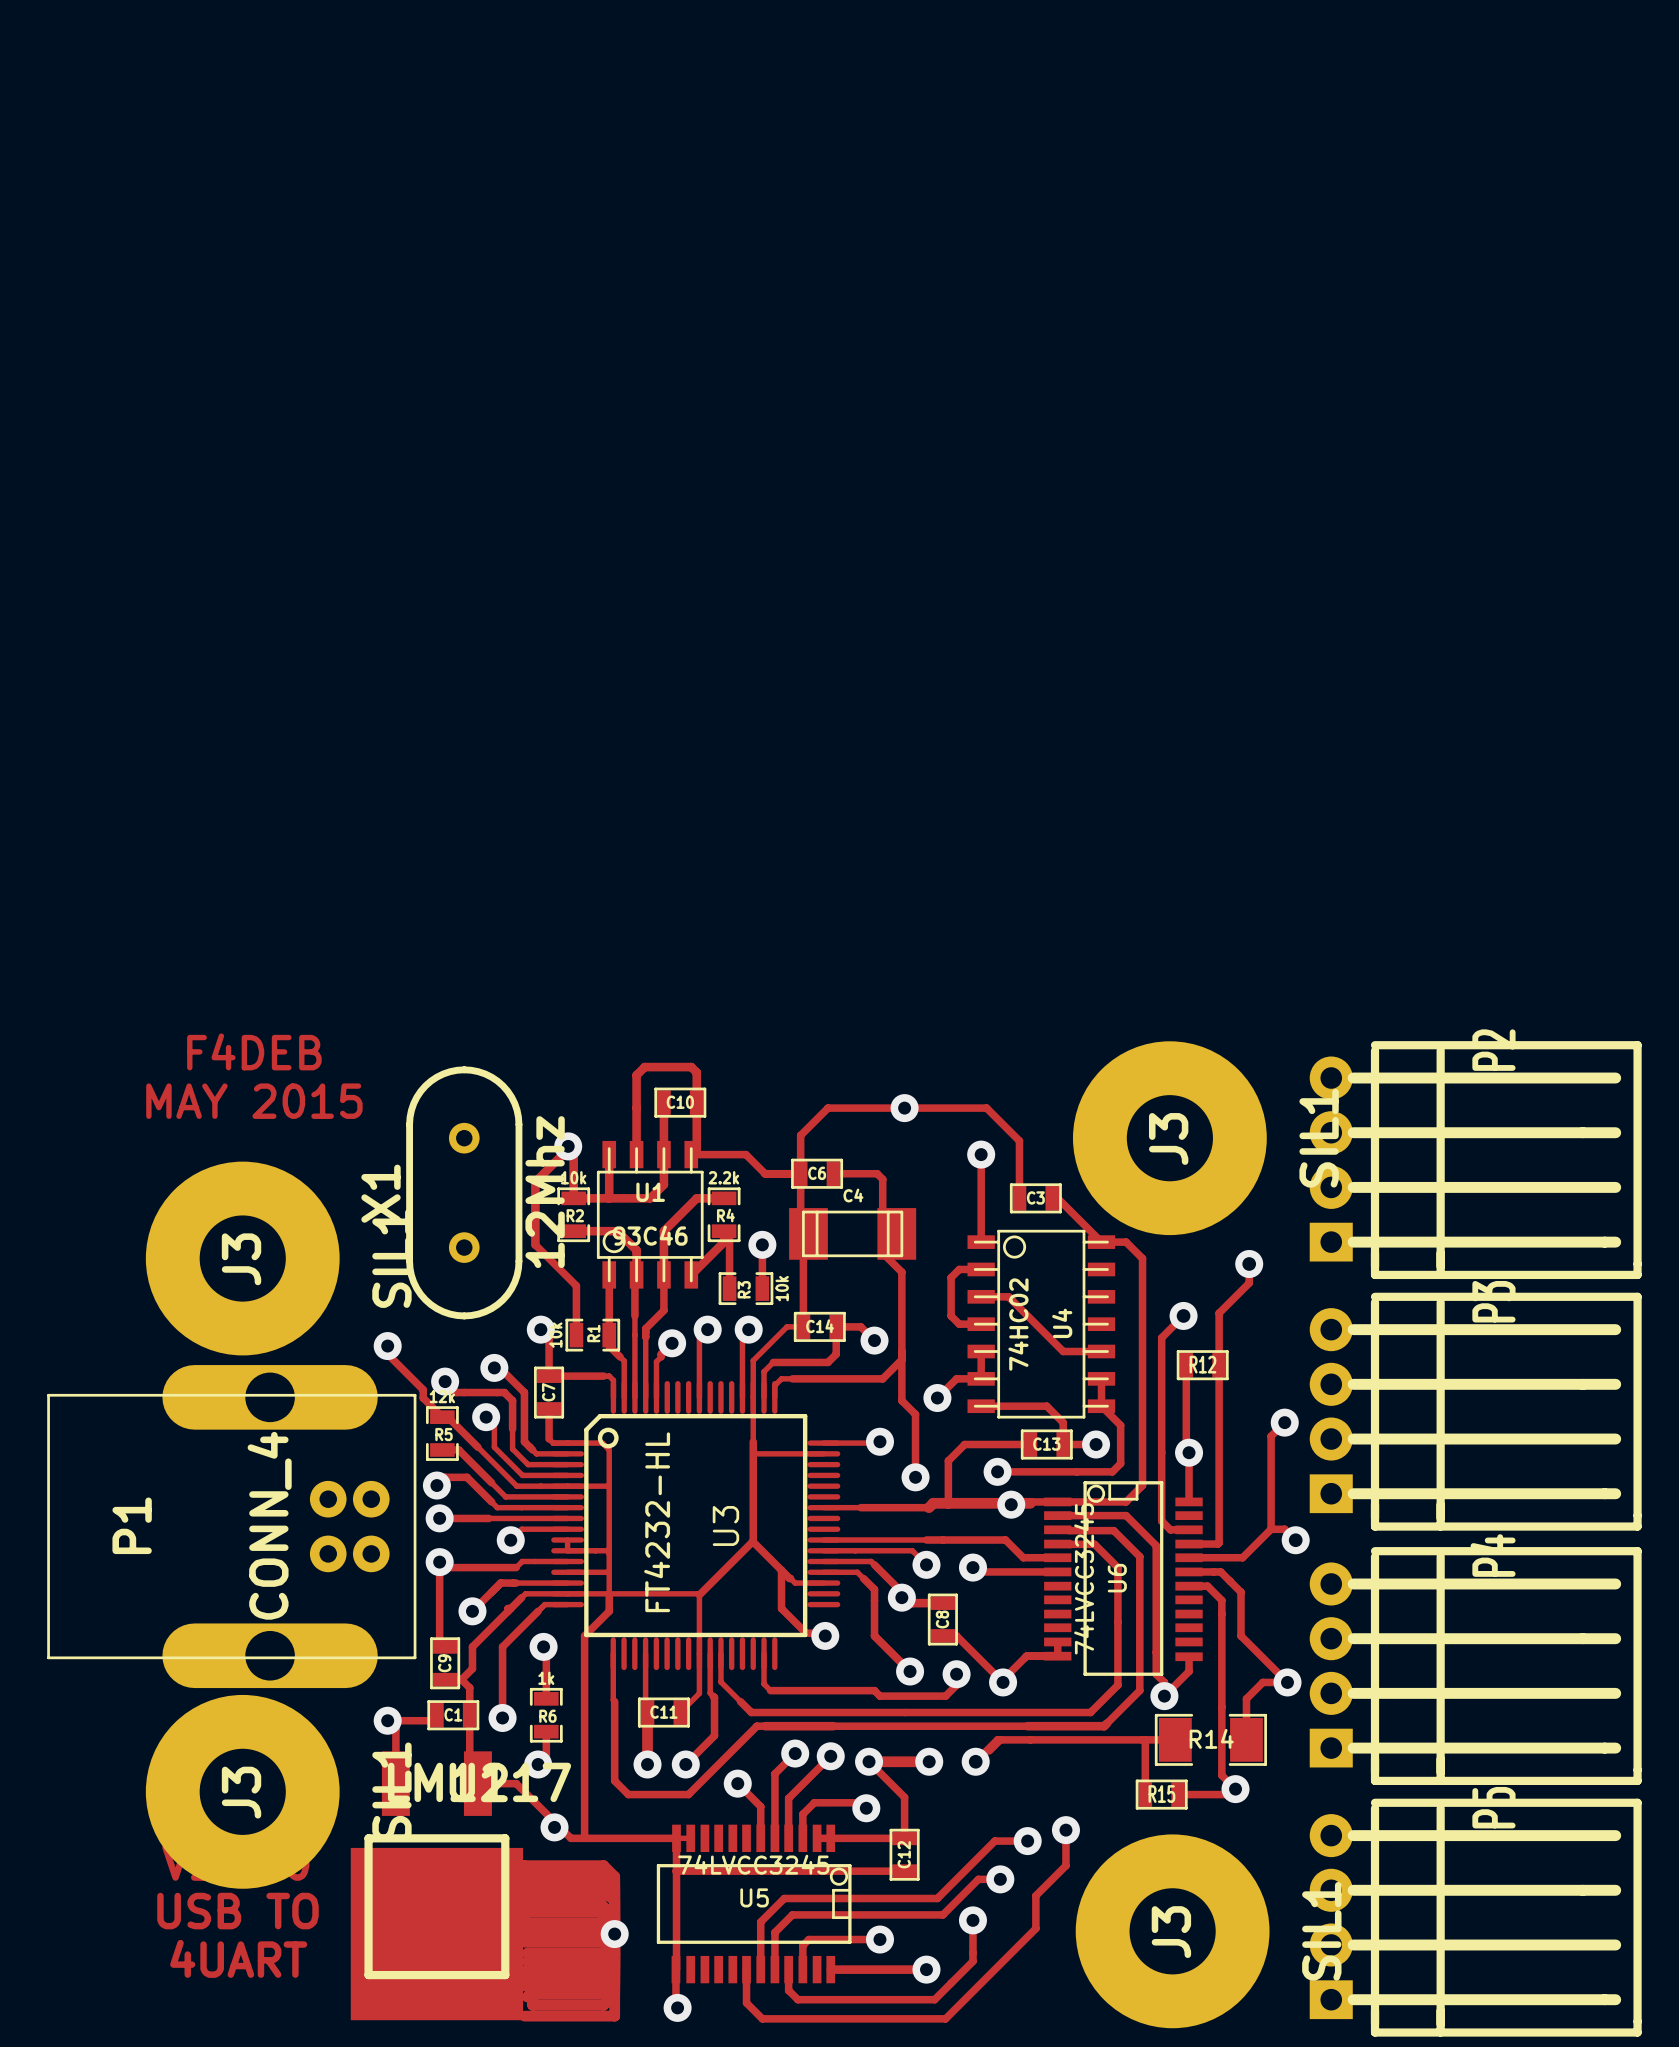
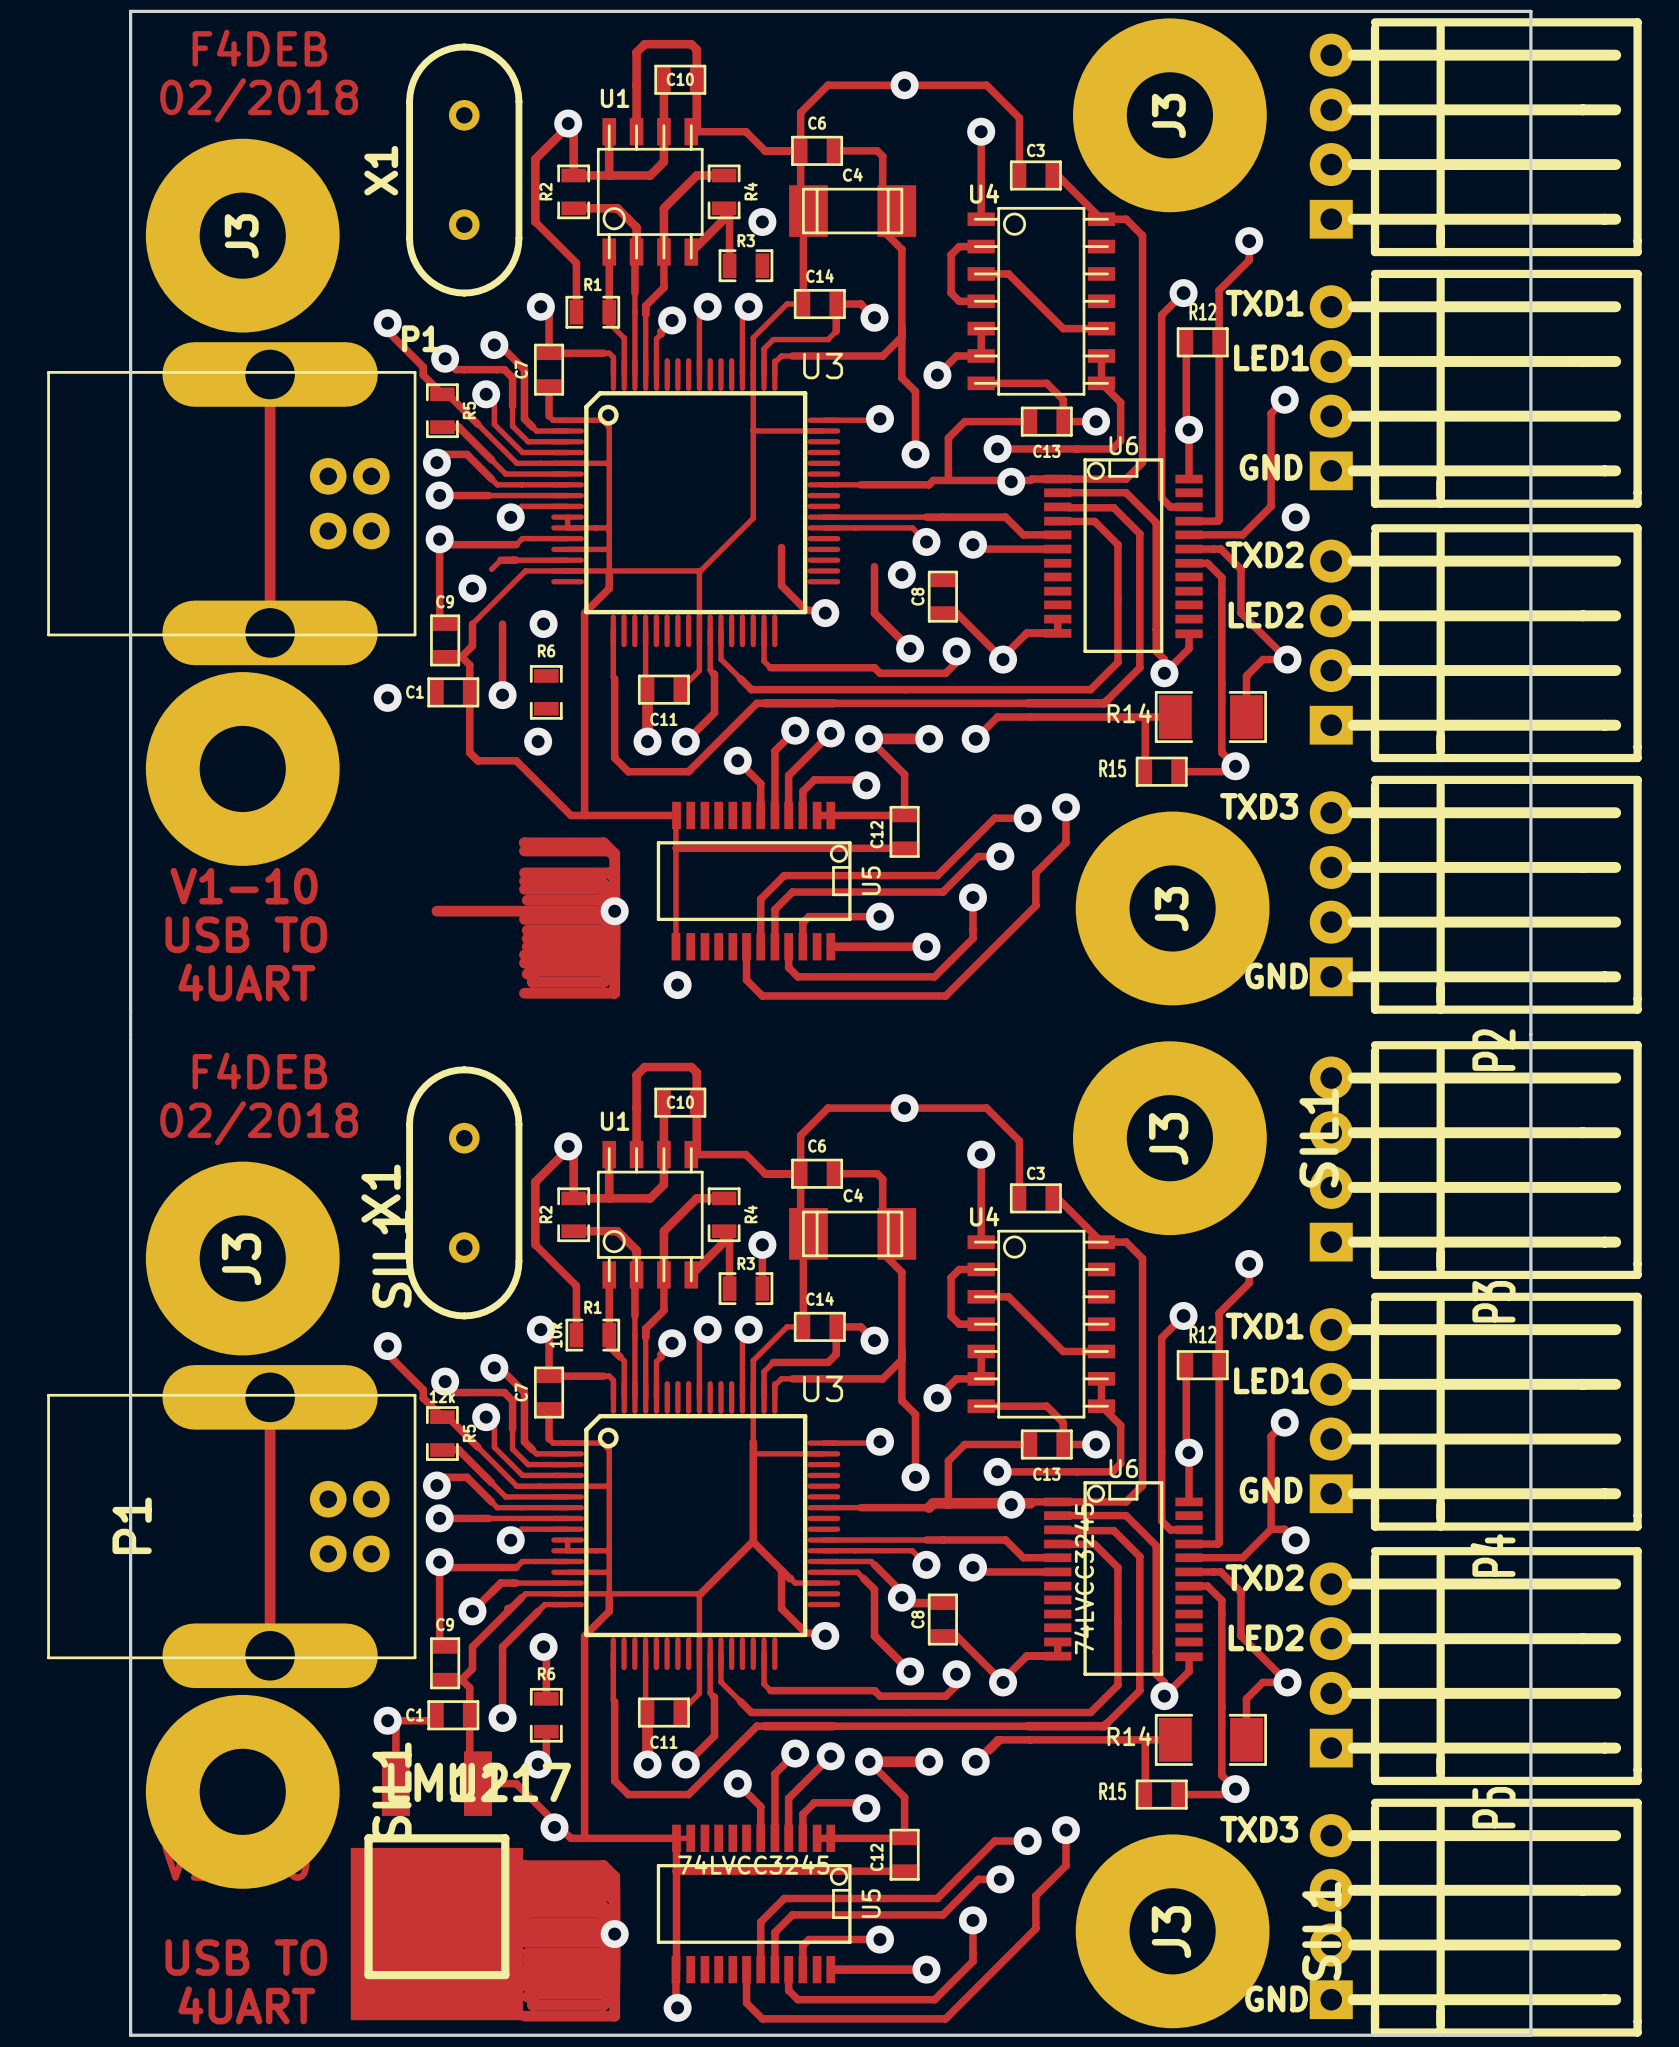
board edge: none -> (130, 11) (130, 2035) (1530, 2035) (1530, 11) (130, 11)
text: none -> F4DEB (259, 48)
track: none -> (663, 79) (663, 161) (650, 175) (573, 175) (573, 131) (568, 126)
C10: none -> (680, 79)
via: none -> (904, 85)
text: none -> 02/2018 (259, 100)
J3: none -> (1169, 115)
via: none -> (568, 123)
track: none -> (568, 126) (535, 159) (535, 221) (576, 263) (576, 312)
track: none -> (609, 131) (609, 175)
track: none -> (636, 131) (636, 52) (644, 44) (691, 44) (696, 49) (696, 126) (691, 131) (745, 131) (765, 150) (800, 150)
track: none -> (981, 131) (981, 219)
via: none -> (981, 131)
part: none -> (1475, 137)
C6: none -> (817, 150)
track: none -> (833, 150) (877, 150) (882, 156) (882, 230) (901, 249) (901, 377) (915, 391) (915, 454)
X1: none -> (464, 170)
track: none -> (724, 175) (696, 175) (663, 208) (663, 287) (645, 305) (645, 314)
track: none -> (1019, 175) (1019, 118) (986, 85) (828, 85) (800, 112) (800, 189) (822, 211) (803, 230) (803, 304) (787, 304) (753, 337) (753, 518) (699, 572)
C3: none -> (1035, 175)
track: none -> (1052, 175) (1057, 175) (1101, 219) (1126, 219) (1142, 235) (1142, 462) (1126, 479) (933, 480) (928, 484) (823, 484)
R2: none -> (573, 191)
U1: none -> (650, 191)
R4: none -> (724, 191)
track: none -> (573, 208) (617, 208) (636, 227) (636, 252)
C4: none -> (852, 211)
via: none -> (762, 221)
J3: none -> (242, 235)
track: none -> (1249, 241) (1249, 260) (1219, 290) (1219, 520) (1189, 521)
via: none -> (1249, 241)
track: none -> (981, 246) (959, 246) (951, 254) (951, 293) (959, 301) (981, 301)
track: none -> (691, 252) (724, 219) (724, 208) (729, 213) (729, 265)
track: none -> (634, 253) (634, 374)
R3: none -> (745, 265)
track: none -> (981, 273) (1008, 273) (1063, 328) (1101, 328)
track: none -> (1183, 293) (1161, 314) (1161, 498) (1170, 506) (1189, 506)
via: none -> (1183, 293)
U4: none -> (1041, 301)
text: none -> TXD1 (1264, 303)
C14: none -> (819, 304)
track: none -> (540, 306) (549, 314) (549, 353) (609, 353) (613, 357) (613, 374)
via: none -> (540, 306)
track: none -> (707, 306) (699, 315) (699, 374)
via: none -> (707, 306)
track: none -> (748, 306) (742, 313) (742, 374)
via: none -> (748, 306)
R1: none -> (592, 312)
track: none -> (645, 314) (645, 374)
track: none -> (874, 317) (860, 304) (836, 304) (836, 331) (828, 339) (773, 339) (764, 348) (764, 374)
via: none -> (874, 317)
track: none -> (672, 320) (656, 338) (656, 374)
via: none -> (672, 320)
track: none -> (387, 323) (387, 331) (423, 366) (423, 375) (442, 394) (447, 394) (516, 463) (609, 463)
via: none -> (387, 323)
track: none -> (609, 323) (609, 252) (609, 323)
track: none -> (609, 323) (624, 338) (624, 374)
track: none -> (981, 328) (981, 355) (956, 355) (937, 375)
track: none -> (1186, 342) (1186, 427) (1189, 429) (1189, 479)
R12: none -> (1202, 342)
track: none -> (494, 345) (499, 345) (524, 369) (524, 418) (536, 430) (567, 430)
via: none -> (494, 345)
track: none -> (882, 355) (901, 336) (882, 355)
track: none -> (882, 355) (781, 355) (774, 362) (774, 374)
track: none -> (1101, 355) (1101, 383) (1120, 402) (1120, 440) (1112, 448) (997, 448)
text: none -> LED1 (1271, 357)
track: none -> (445, 358) (456, 369) (504, 369) (512, 377) (512, 426) (528, 441) (567, 441)
via: none -> (445, 358)
C7: none -> (549, 369)
track: none -> (270, 374) (270, 632)
via: none -> (937, 375)
track: none -> (981, 383) (1046, 383) (1063, 399) (1063, 421) (1096, 421)
track: none -> (549, 386) (549, 416) (553, 420) (602, 420) (609, 427) (609, 588) (584, 613) (584, 815)
part: none -> (1475, 388)
track: none -> (486, 394) (494, 402) (494, 424) (522, 452) (567, 452)
via: none -> (486, 394)
track: none -> (1284, 399) (1271, 413) (1271, 506) (1242, 534) (1189, 534)
via: none -> (1284, 399)
R5: none -> (442, 410)
track: none -> (879, 418) (823, 420)
via: none -> (879, 418)
track: none -> (1030, 421) (964, 421) (948, 438) (948, 480)
C13: none -> (1046, 421)
via: none -> (1096, 421)
track: none -> (442, 427) (458, 427) (505, 474) (567, 474)
via: none -> (1189, 429)
track: none -> (754, 430) (823, 430)
via: none -> (997, 448)
via: none -> (915, 454)
track: none -> (436, 462) (445, 454) (467, 454) (497, 484) (567, 484)
via: none -> (436, 462)
text: none -> GND (1271, 467)
via: none -> (1011, 481)
track: none -> (1057, 492) (1126, 492) (1156, 522) (1156, 651) (1164, 659) (1164, 673) (1189, 648) (1189, 633)
track: none -> (439, 495) (567, 495)
via: none -> (439, 495)
U3: none -> (695, 502)
P1: none -> (231, 503)
track: none -> (567, 506) (521, 506) (510, 517)
track: none -> (1068, 507) (1113, 507) (1139, 533) (1139, 667) (1104, 703) (756, 703) (688, 771) (628, 771) (614, 758) (613, 630)
via: none -> (510, 517)
track: none -> (567, 517) (567, 527) (609, 527)
track: none -> (823, 517) (1005, 517) (1023, 534) (1057, 534)
via: none -> (1295, 517)
track: none -> (1068, 521) (1094, 521) (1117, 544) (1117, 662) (1090, 689) (751, 689) (720, 659) (720, 630)
track: none -> (823, 527) (912, 527) (926, 541)
track: none -> (567, 538) (522, 538) (516, 544) (445, 544) (439, 539) (439, 618) (445, 624)
via: none -> (439, 539)
via: none -> (926, 541)
track: none -> (972, 544) (977, 549) (1057, 549)
via: none -> (972, 544)
track: none -> (781, 547) (781, 585) (806, 610) (822, 610) (825, 613)
track: none -> (567, 549) (609, 549)
track: none -> (1189, 549) (1220, 549) (1241, 569) (1241, 613) (1287, 659) (1262, 659) (1246, 675) (1246, 717)
text: none -> TXD2 (1264, 554)
U6: none -> (1123, 555)
track: none -> (567, 560) (500, 560) (491, 569)
track: none -> (1189, 563) (1207, 563) (1221, 577) (1221, 752) (1235, 766) (1230, 771) (1178, 771)
track: none -> (874, 566) (874, 613) (910, 648)
track: none -> (699, 572) (699, 670) (680, 689)
track: none -> (699, 572) (525, 570) (472, 624) (472, 645) (461, 656)
via: none -> (901, 574)
via: none -> (472, 588)
C8: none -> (942, 596)
via: none -> (825, 613)
track: none -> (942, 613) (956, 613) (1003, 659) (1003, 656) (1026, 633) (1057, 633) (1057, 619)
text: none -> LED2 (1266, 615)
track: none -> (502, 624) (502, 695)
via: none -> (543, 624)
track: none -> (645, 630) (647, 741)
track: none -> (710, 630) (710, 670) (714, 674) (714, 712) (685, 741)
track: none -> (764, 630) (764, 661) (770, 667) (874, 667) (879, 673) (945, 673) (956, 662) (956, 651)
C9: none -> (445, 640)
part: none -> (1475, 643)
via: none -> (910, 648)
via: none -> (956, 651)
track: none -> (461, 656) (469, 665) (469, 752) (477, 760) (516, 760) (570, 815) (676, 815) (675, 946)
via: none -> (1003, 659)
via: none -> (1287, 659)
via: none -> (1164, 673)
C11: none -> (663, 689)
C1: none -> (453, 692)
R6: none -> (546, 692)
via: none -> (502, 695)
via: none -> (387, 697)
track: none -> (1145, 717) (1145, 771)
track: none -> (1175, 717) (997, 717) (975, 738)
R14: none -> (1210, 717)
track: none -> (795, 730) (774, 750) (774, 815)
via: none -> (795, 730)
track: none -> (830, 733) (788, 775) (788, 815)
via: none -> (830, 733)
via: none -> (869, 738)
track: none -> (929, 738) (869, 738) (904, 774) (904, 815) (817, 815)
via: none -> (929, 738)
via: none -> (975, 738)
via: none -> (538, 741)
via: none -> (647, 741)
via: none -> (685, 741)
track: none -> (737, 760) (760, 783) (760, 815)
via: none -> (737, 760)
via: none -> (1235, 766)
part: none -> (242, 768)
R15: none -> (1161, 771)
track: none -> (866, 785) (860, 779) (814, 779) (802, 791) (802, 815)
via: none -> (866, 785)
text: none -> TXD3 (1259, 806)
track: none -> (1065, 807) (1065, 842) (1035, 872) (1035, 905) (945, 995) (762, 995) (746, 980) (746, 946)
via: none -> (1065, 807)
track: none -> (1027, 818) (994, 818) (937, 875) (784, 875) (760, 899) (760, 946)
via: none -> (1027, 818)
C12: none -> (904, 831)
track: none -> (527, 845) (524, 842) (603, 842) (614, 853) (614, 993) (524, 993)
track: none -> (677, 848) (675, 848) (904, 848)
track: none -> (524, 851) (609, 851) (614, 856)
track: none -> (1000, 856) (978, 856) (942, 892) (792, 892) (774, 909) (774, 946)
via: none -> (1000, 856)
track: none -> (524, 872) (609, 872) (614, 878)
track: none -> (524, 881) (601, 881) (614, 894)
U5: none -> (754, 881)
text: none -> V1-10 (244, 886)
track: none -> (524, 889) (601, 889) (614, 902)
part: none -> (1475, 894)
track: none -> (972, 897) (972, 938) (934, 976) (797, 976) (788, 967) (788, 946)
via: none -> (972, 897)
track: none -> (527, 900) (601, 900) (611, 911)
J3: none -> (1172, 908)
track: none -> (436, 911) (614, 911)
via: none -> (614, 911)
track: none -> (614, 913) (609, 919) (524, 919)
track: none -> (879, 916) (808, 916) (802, 922) (802, 946)
via: none -> (879, 916)
track: none -> (614, 919) (603, 930) (527, 930)
track: none -> (614, 933) (609, 938) (527, 938)
text: none -> USB TO (246, 934)
track: none -> (614, 944) (611, 946) (527, 946)
track: none -> (830, 946) (926, 946)
via: none -> (926, 946)
track: none -> (614, 952) (611, 954) (524, 954)
track: none -> (614, 960) (611, 963) (524, 963)
track: none -> (614, 965) (609, 971) (529, 971) (527, 974)
track: none -> (614, 971) (603, 982) (532, 982) (532, 976)
text: none -> GND (1276, 976)
text: none -> 4UART (246, 982)
via: none -> (677, 985)
text position: F4DEB (254, 1051) -> F4DEB (259, 1071)
text: MAY 2015 (254, 1101) -> 02/2018 (259, 1123)
C6 name position: C6 (817, 1173) -> C6 (817, 1145)
R2 value: 10k (573, 1177) -> none
R4 value: 2.2k (723, 1177) -> none
X1 value: 12Mhz (545, 1192) -> none
U1 name position: U1 (650, 1192) -> U1 (615, 1121)
C3 name position: C3 (1035, 1197) -> C3 (1035, 1173)
R2 name rotation: 0° (575, 1215) -> 90° counterclockwise (545, 1214)
R2 name position: R2 (575, 1215) -> R2 (545, 1214)
R4 name rotation: 0° (725, 1215) -> 90° counterclockwise (750, 1214)
R4 name position: R4 (725, 1215) -> R4 (750, 1214)
U1 value: 93C46 (650, 1235) -> none
R3 value: 10k (782, 1288) -> none
R3 name rotation: 0° (744, 1289) -> 90° clockwise (746, 1263)
R3 name position: R3 (744, 1289) -> R3 (746, 1263)
U4 name rotation: 0° (1062, 1323) -> 90° clockwise (984, 1216)
U4 name position: U4 (1062, 1323) -> U4 (984, 1216)
U4 value: 74HC02 (1018, 1324) -> none
C14 name position: C14 (820, 1326) -> C14 (820, 1298)
text: none -> TXD1 (1264, 1326)
R1 name rotation: 0° (593, 1333) -> 90° clockwise (593, 1307)
R1 name position: R1 (593, 1333) -> R1 (593, 1307)
R12 name position: R12 (1202, 1364) -> R12 (1202, 1334)
text: none -> LED1 (1271, 1380)
C7 name position: C7 (548, 1392) -> C7 (521, 1392)
track: none -> (270, 1397) (270, 1655)
R5 name rotation: 0° (443, 1434) -> 90° counterclockwise (469, 1433)
R5 name position: R5 (443, 1434) -> R5 (469, 1433)
C13 name position: C13 (1046, 1444) -> C13 (1046, 1474)
text: none -> GND (1271, 1490)
U3 value: FT4232-HL (657, 1522) -> none
P1 value: CONN_4 (269, 1525) -> none
U3 name rotation: 0° (725, 1525) -> 90° clockwise (823, 1388)
U3 name position: U3 (725, 1525) -> U3 (823, 1388)
text: none -> TXD2 (1264, 1577)
U6 name rotation: 0° (1117, 1578) -> 90° clockwise (1123, 1468)
U6 name position: U6 (1117, 1578) -> U6 (1123, 1468)
C8 name position: C8 (942, 1619) -> C8 (917, 1619)
text: none -> LED2 (1266, 1637)
C9 name rotation: 0° (444, 1663) -> 90° clockwise (445, 1624)
C9 name position: C9 (444, 1663) -> C9 (445, 1624)
R6 value: 1k (546, 1678) -> none
C11 name position: C11 (663, 1712) -> C11 (663, 1742)
C1 name position: C1 (453, 1714) -> C1 (415, 1714)
R6 name position: R6 (547, 1716) -> R6 (546, 1673)
R14 name position: R14 (1211, 1738) -> R14 (1129, 1736)
J3 name: J3 (241, 1792) -> none
R15 name position: R15 (1161, 1794) -> R15 (1112, 1791)
text: none -> TXD3 (1259, 1829)
C12 name position: C12 (904, 1854) -> C12 (876, 1857)
U5 name rotation: 0° (754, 1897) -> 90° counterclockwise (871, 1903)
U5 name position: U5 (754, 1897) -> U5 (871, 1903)
text position: USB TO (237, 1911) -> USB TO (246, 1957)
text position: 4UART (238, 1958) -> 4UART (246, 2005)
text: none -> GND (1276, 1998)

